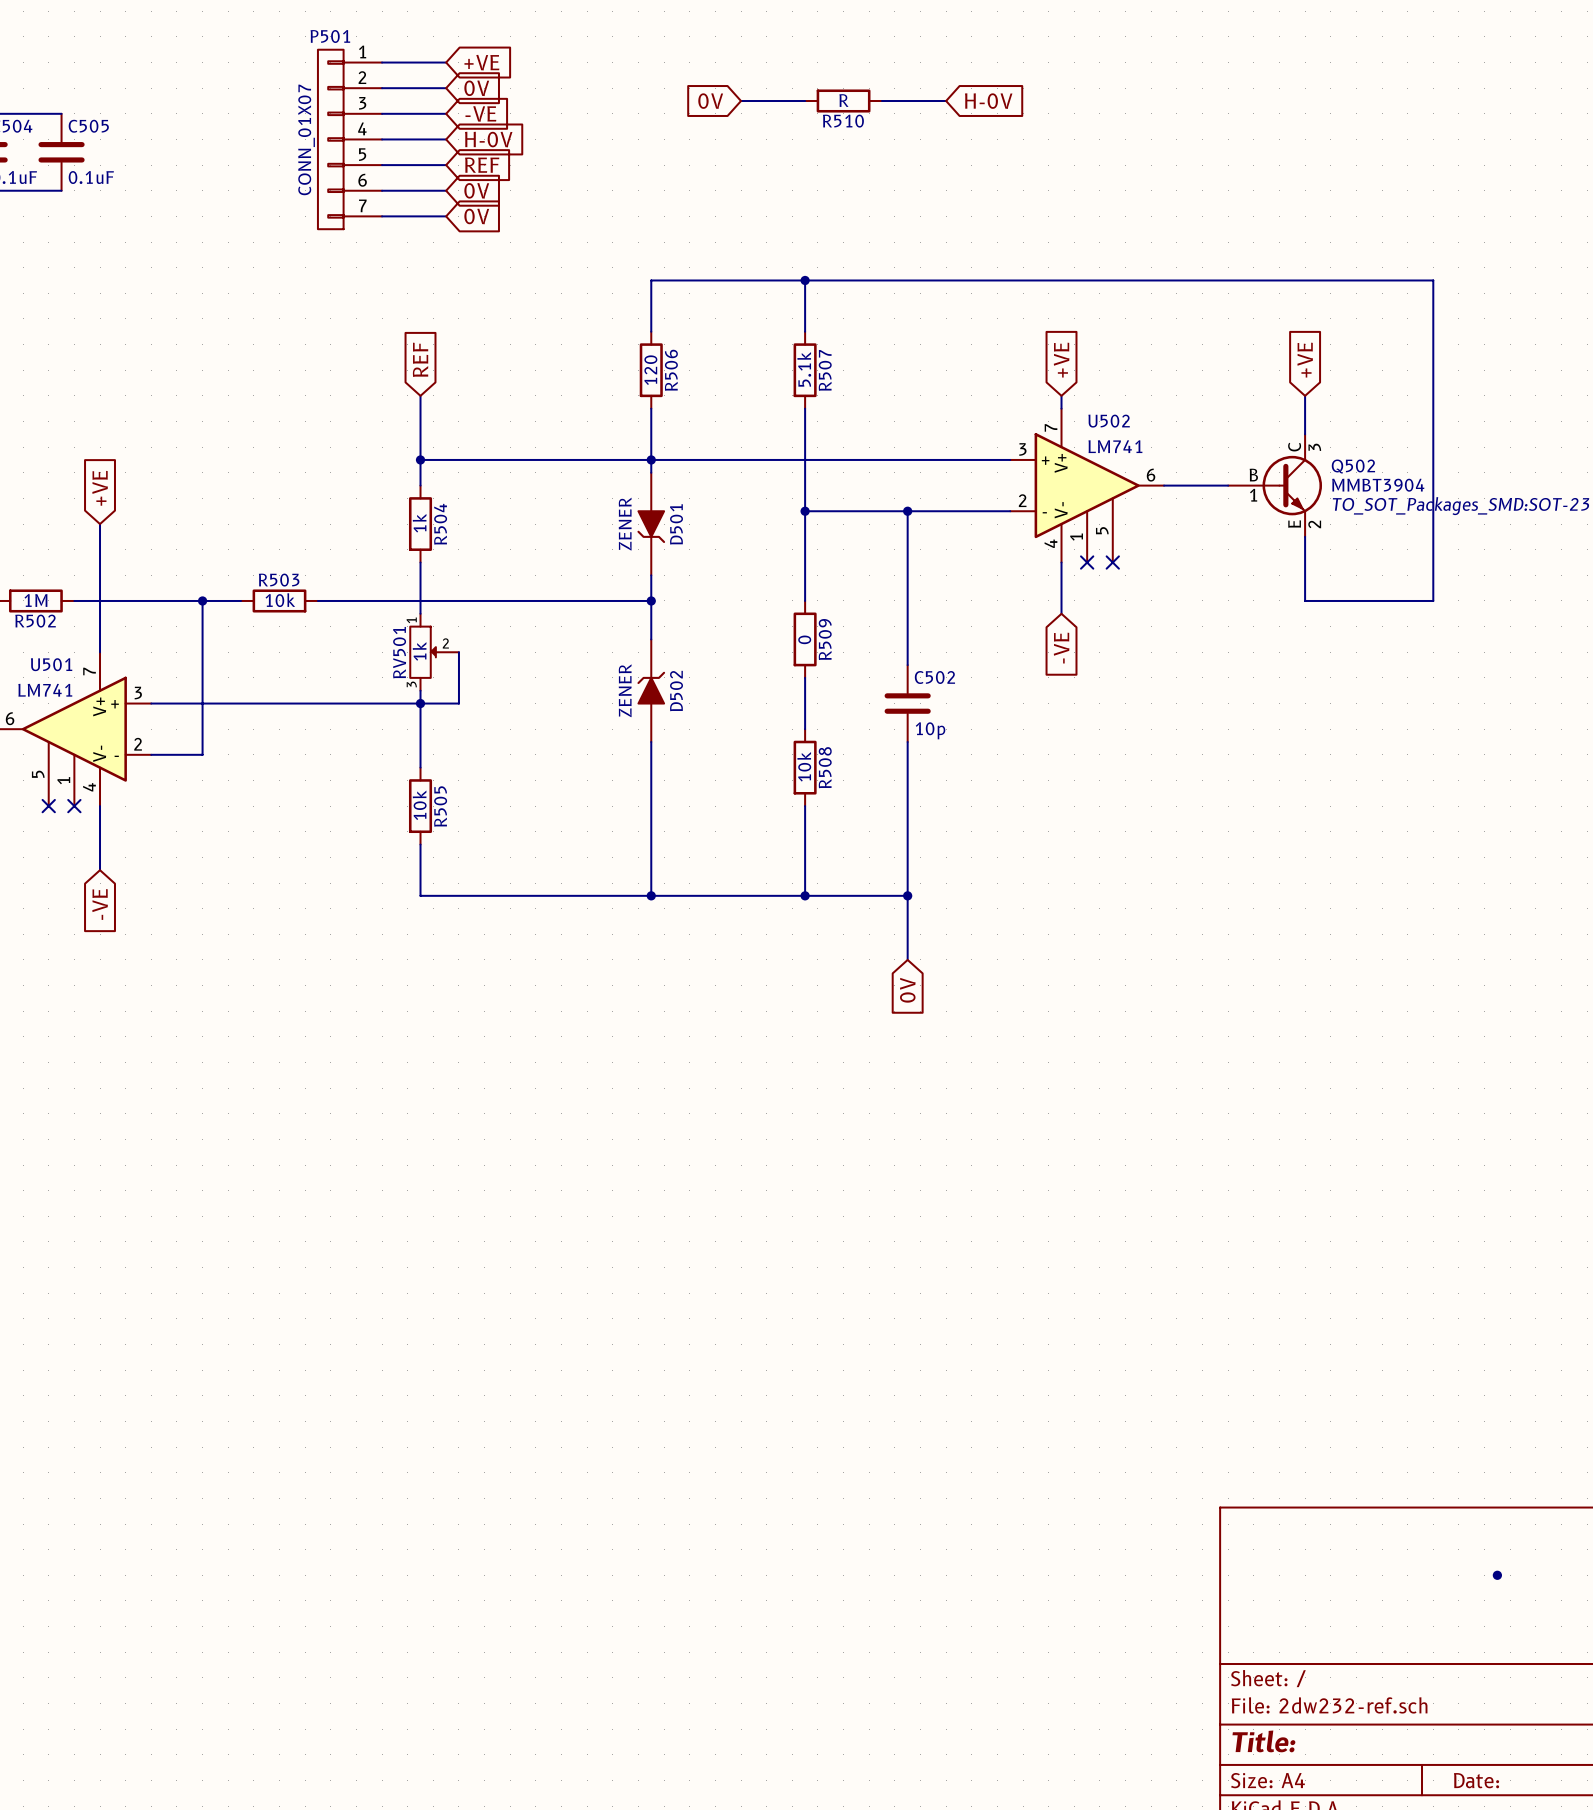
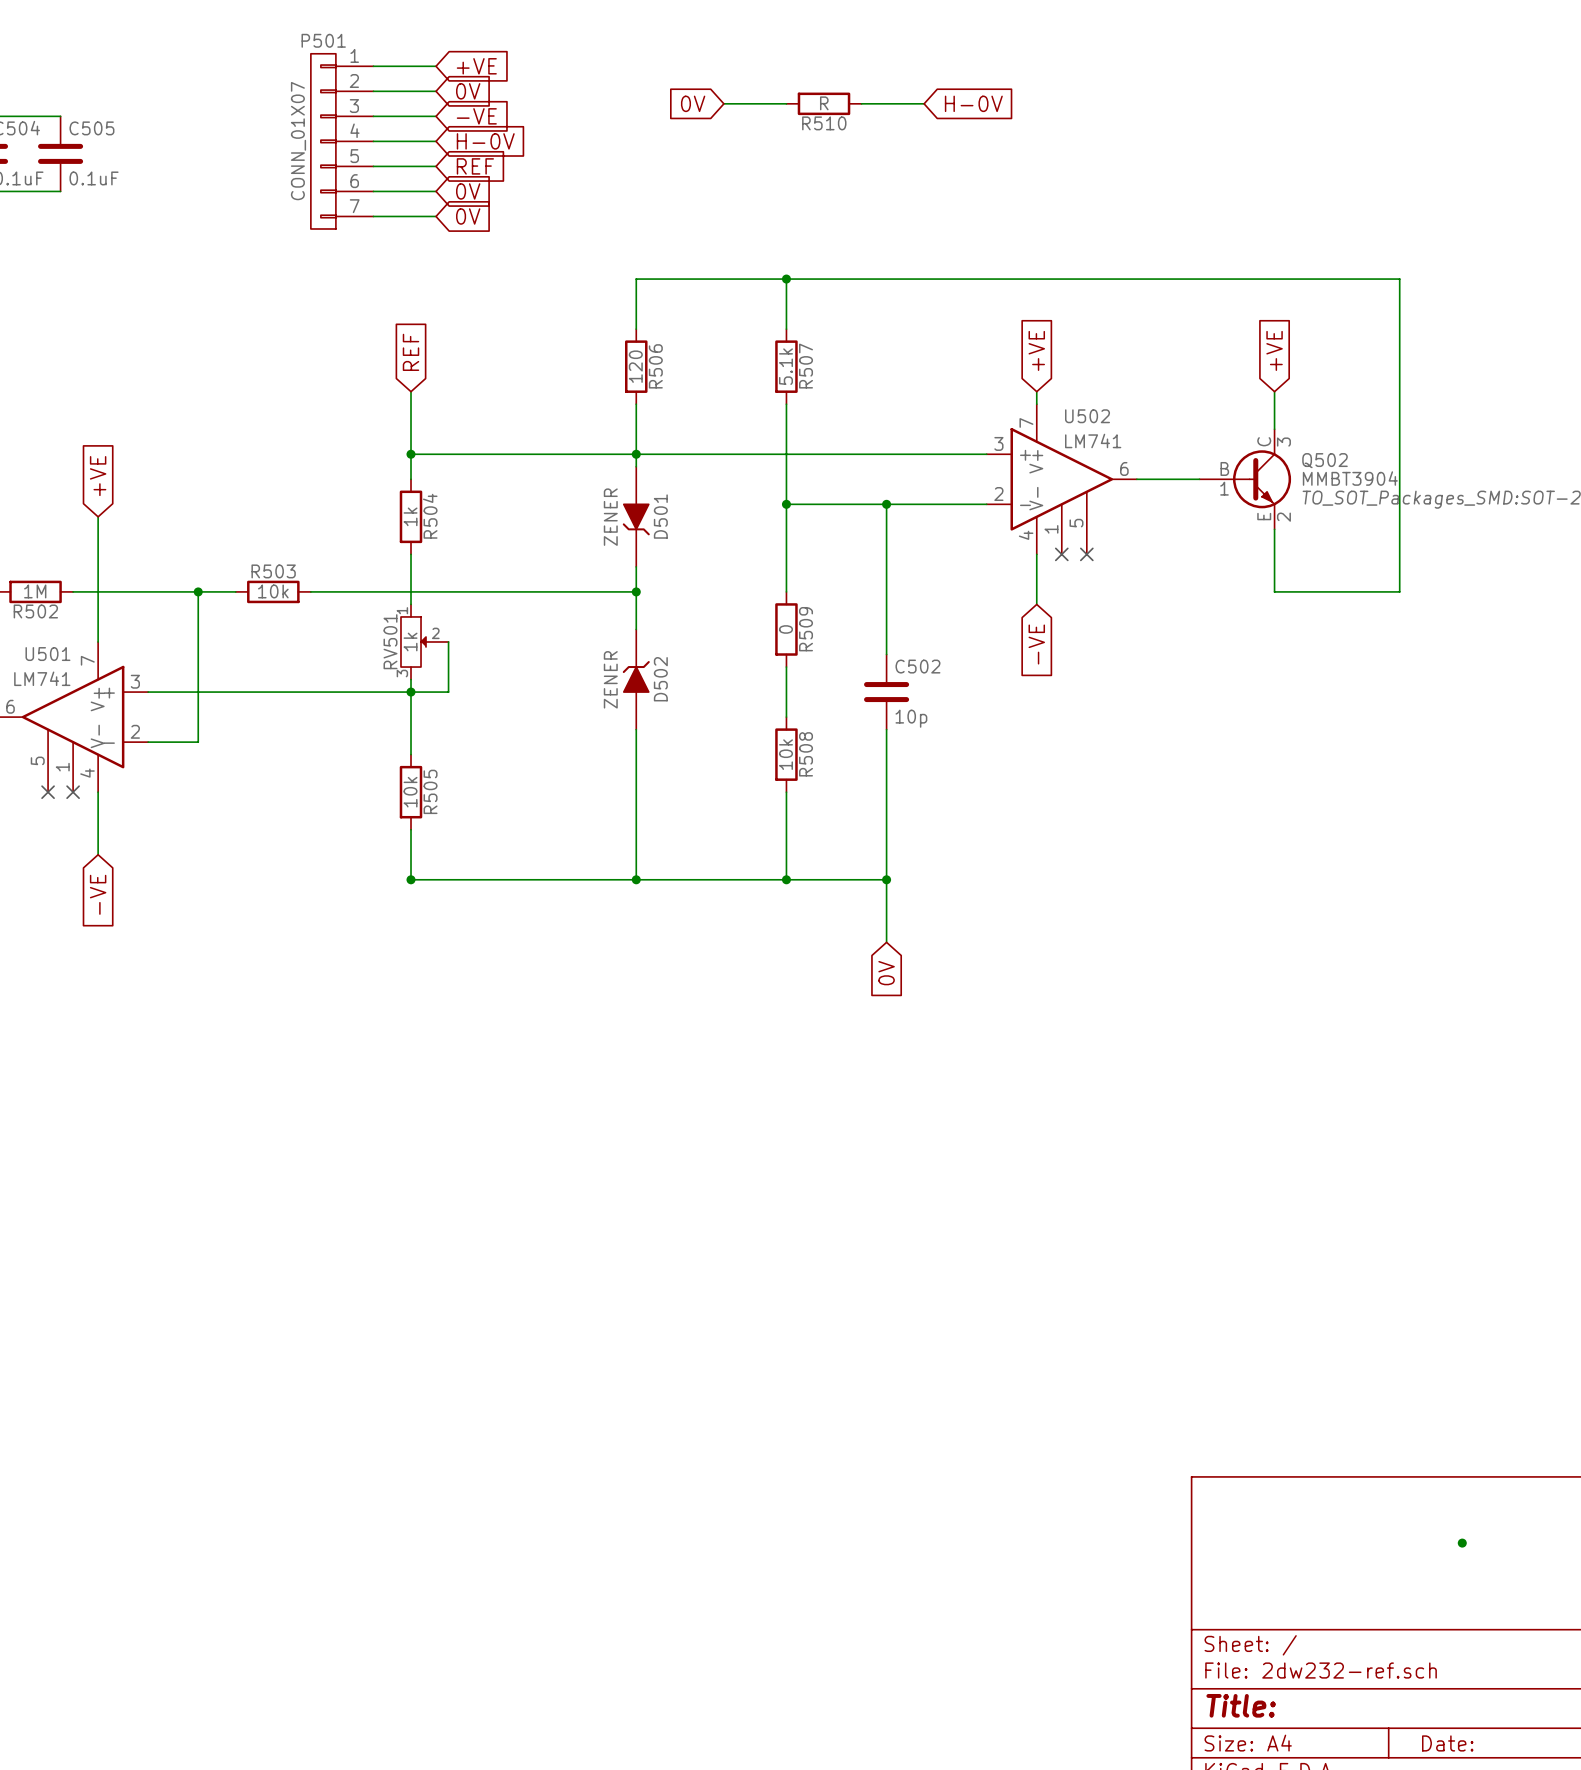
junction: none -> (411, 879)

